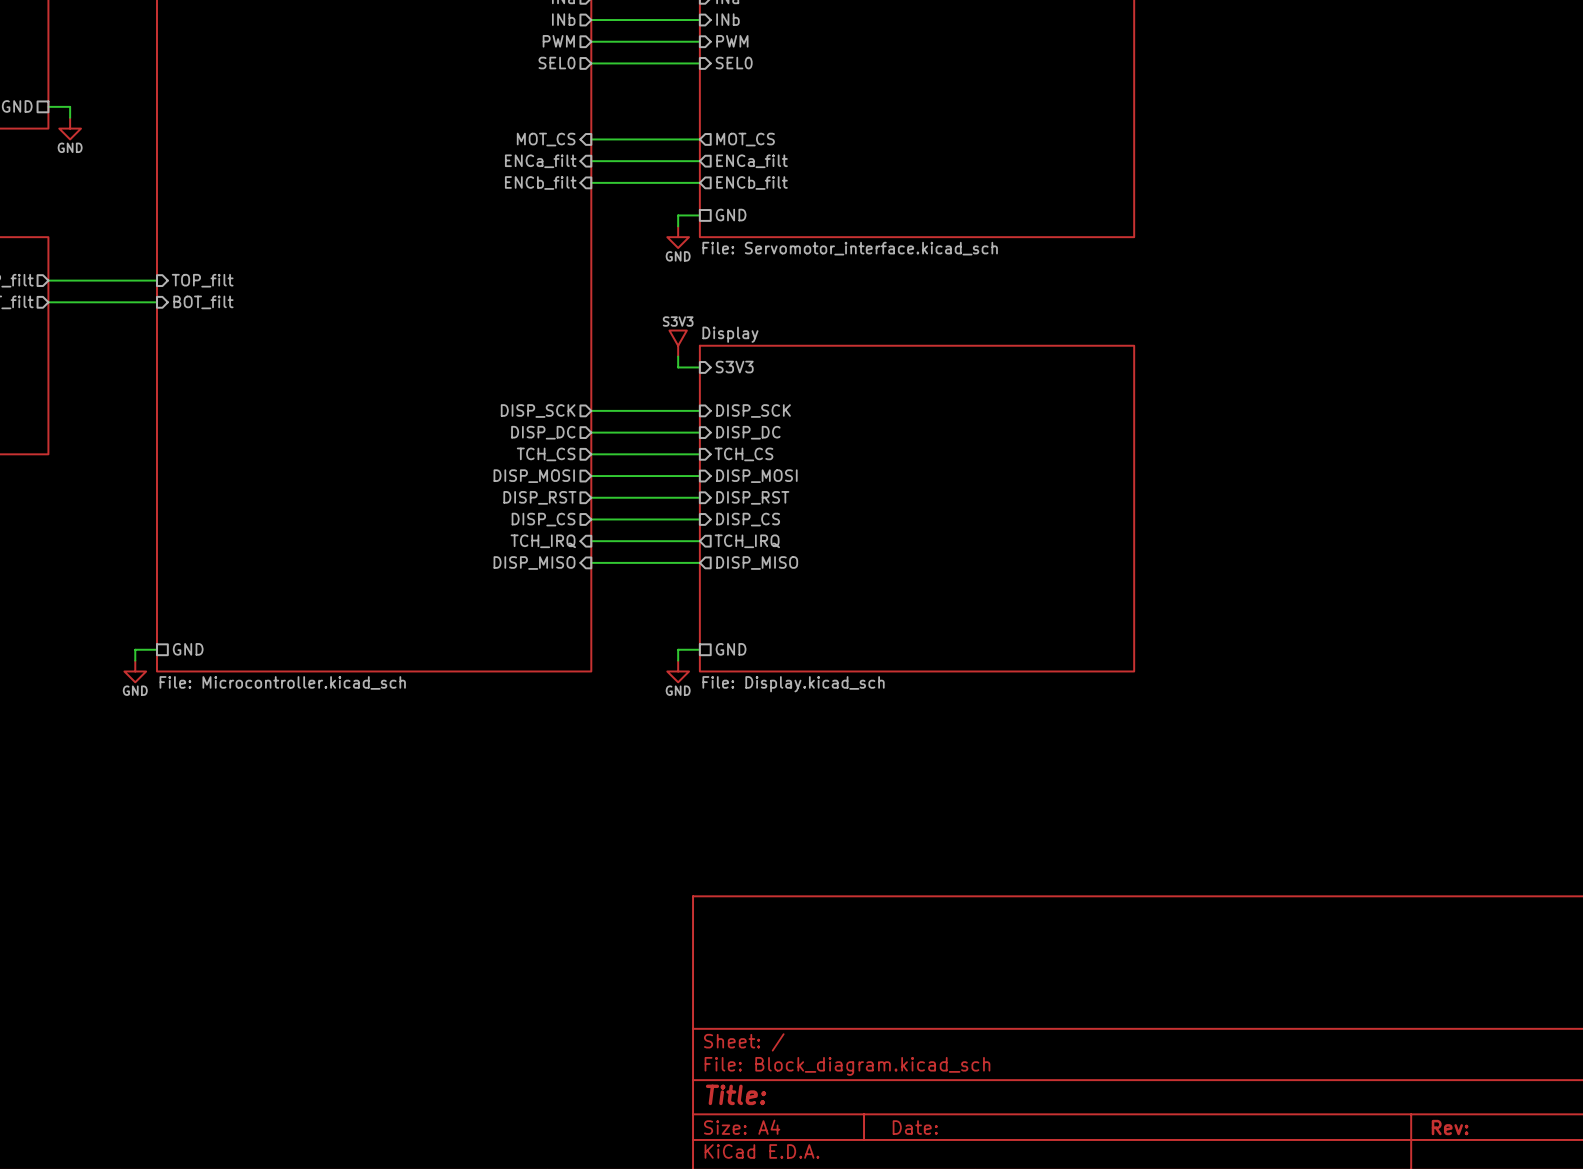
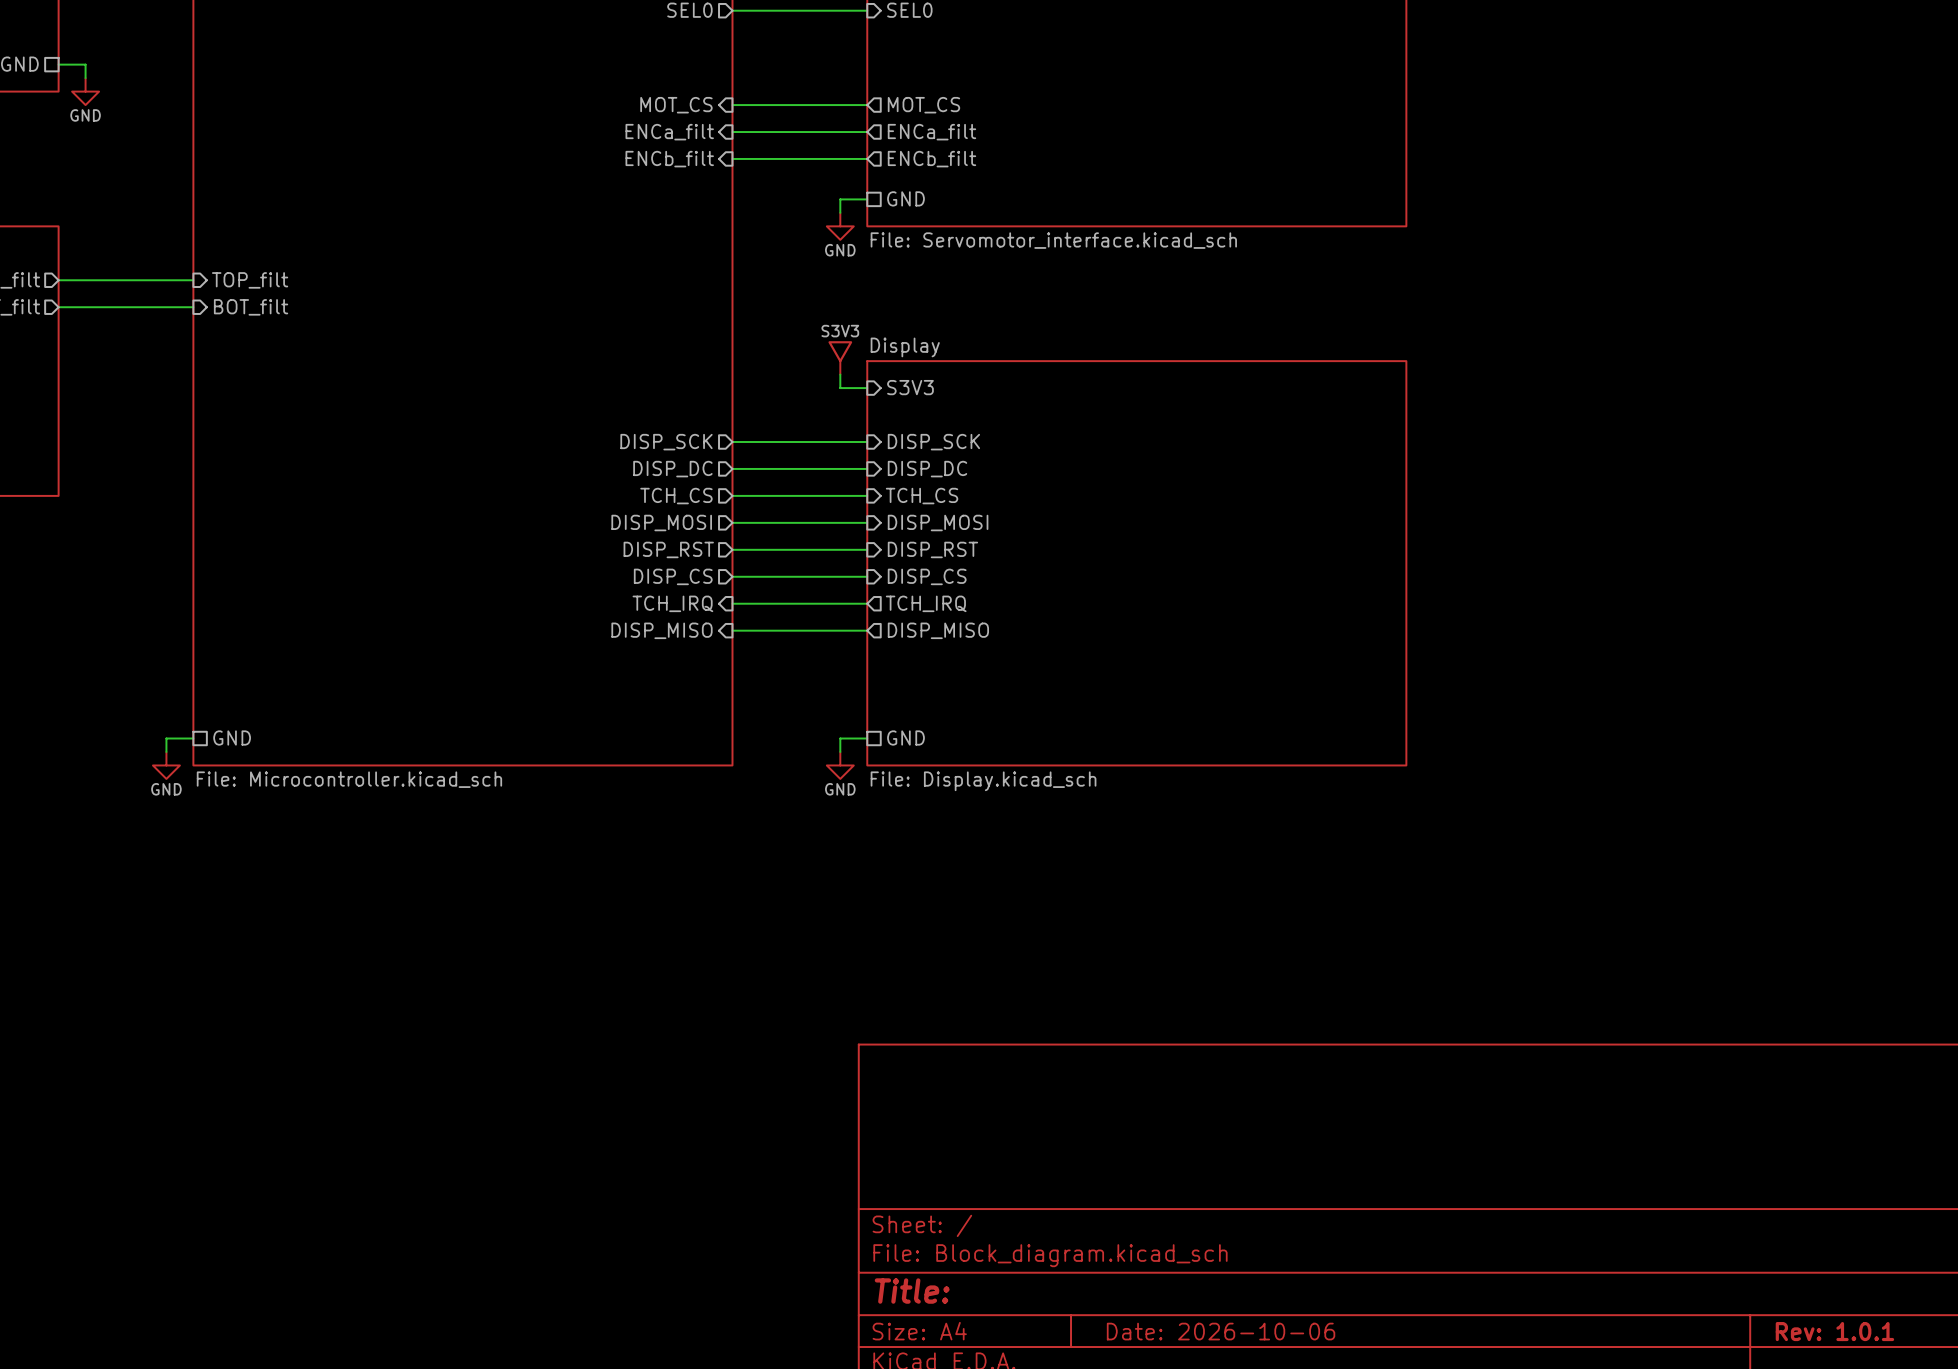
title block: Date: (915, 1127) -> Date: 2026-10-06 (1221, 1331)
title block: Rev: (1450, 1127) -> Rev: 1.0.1 (1834, 1331)

